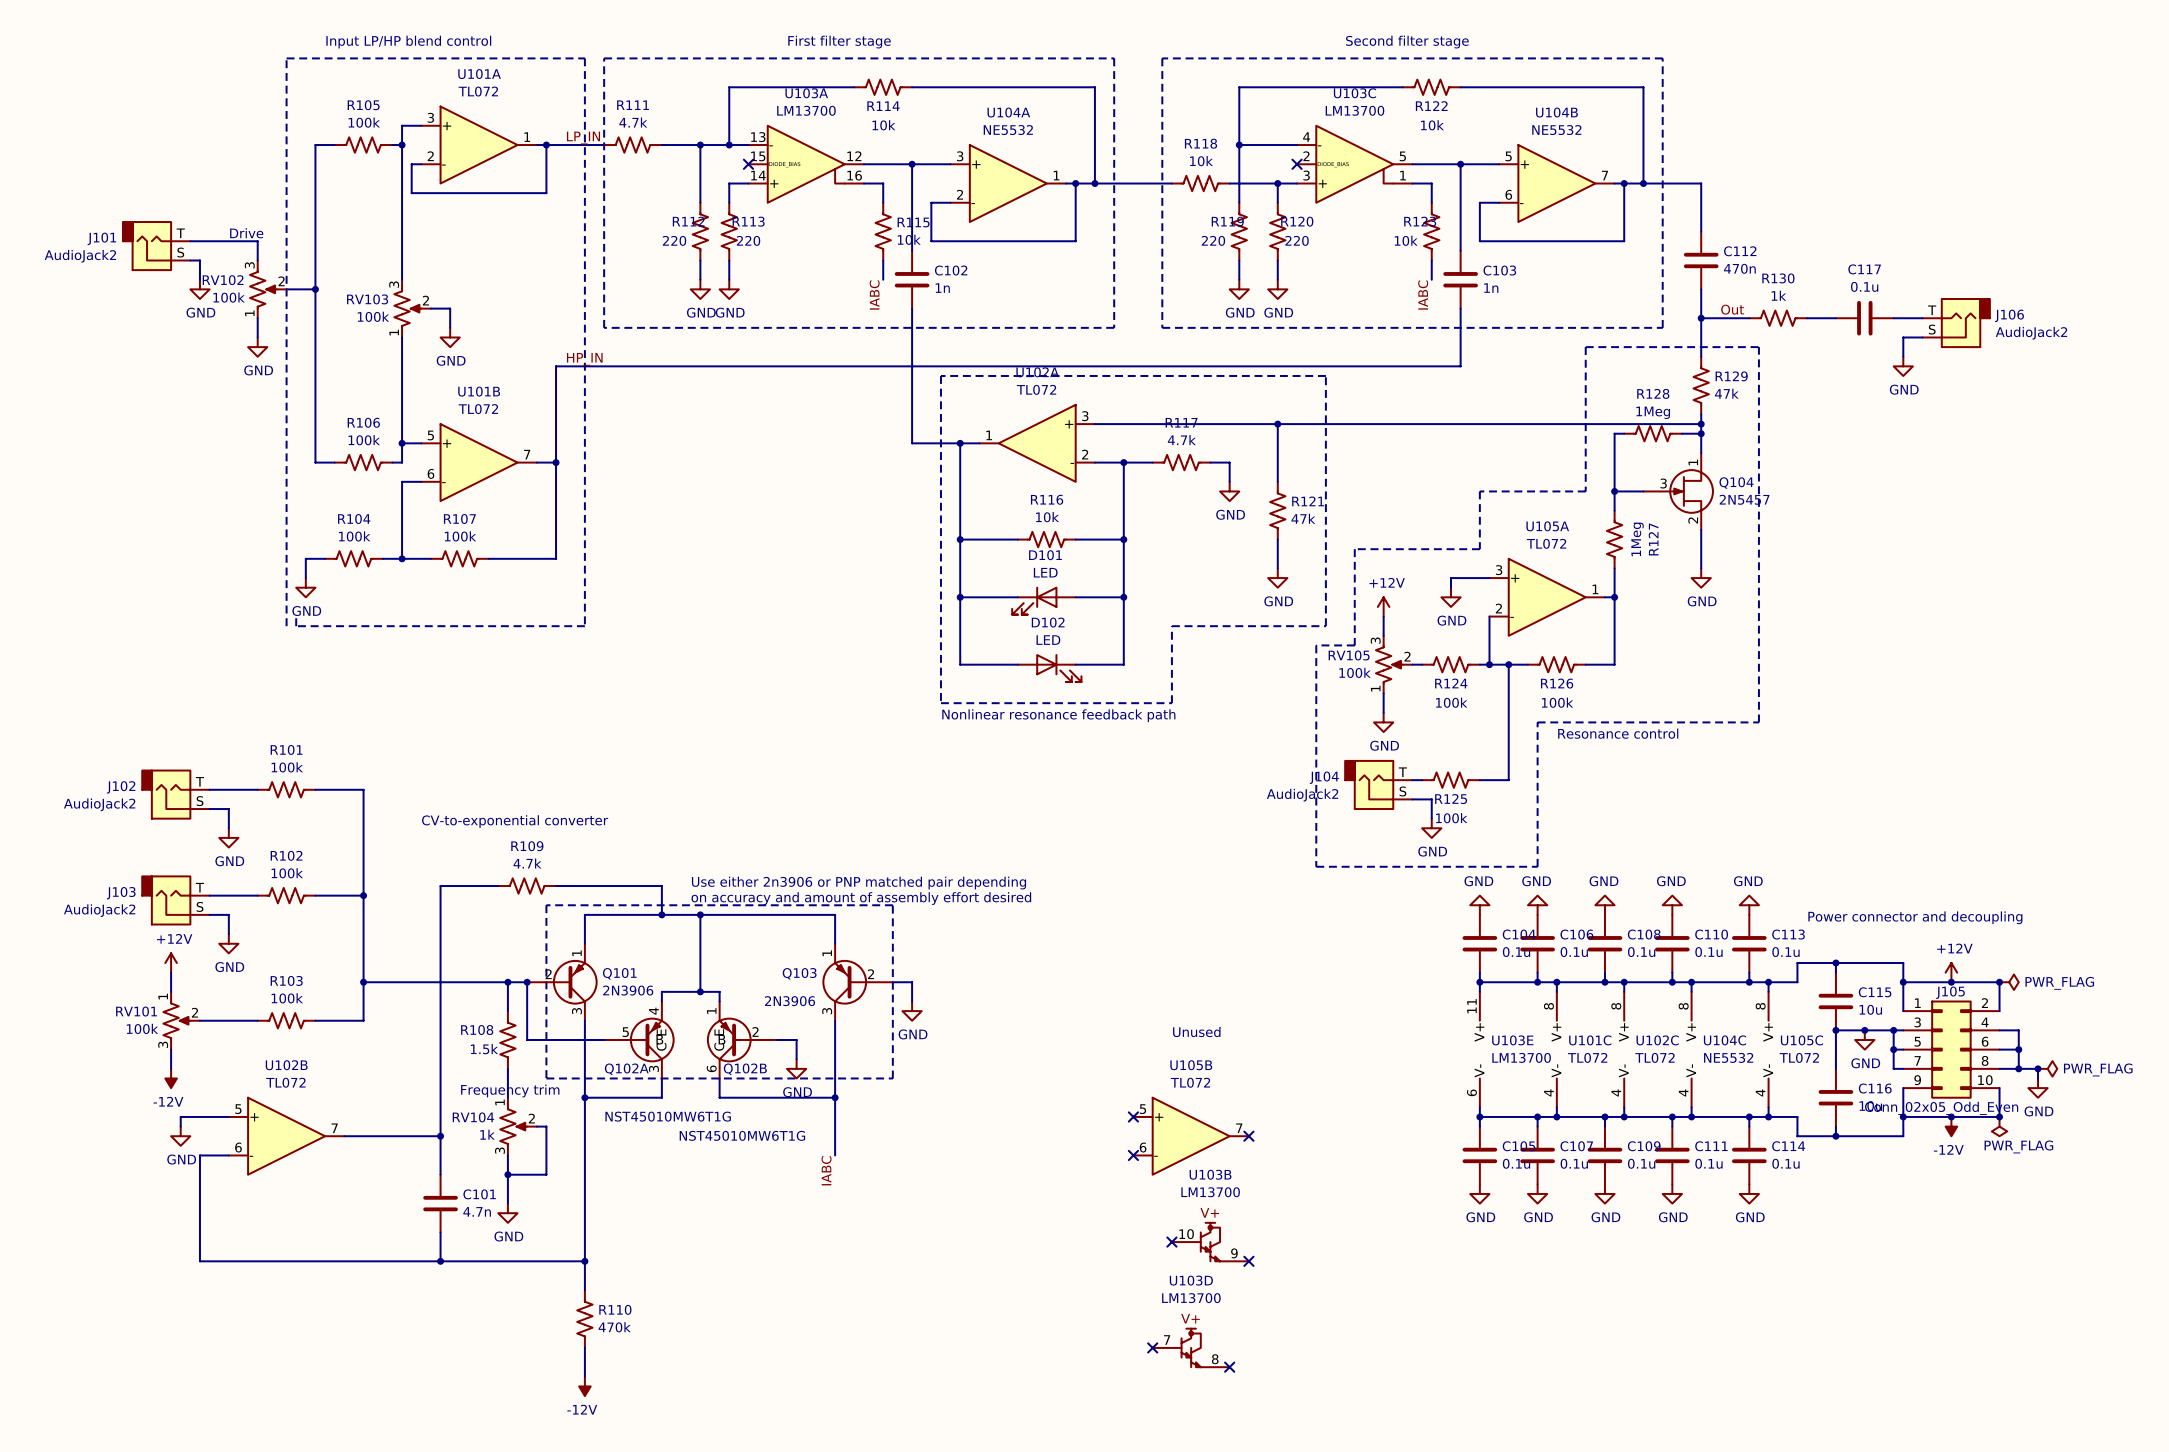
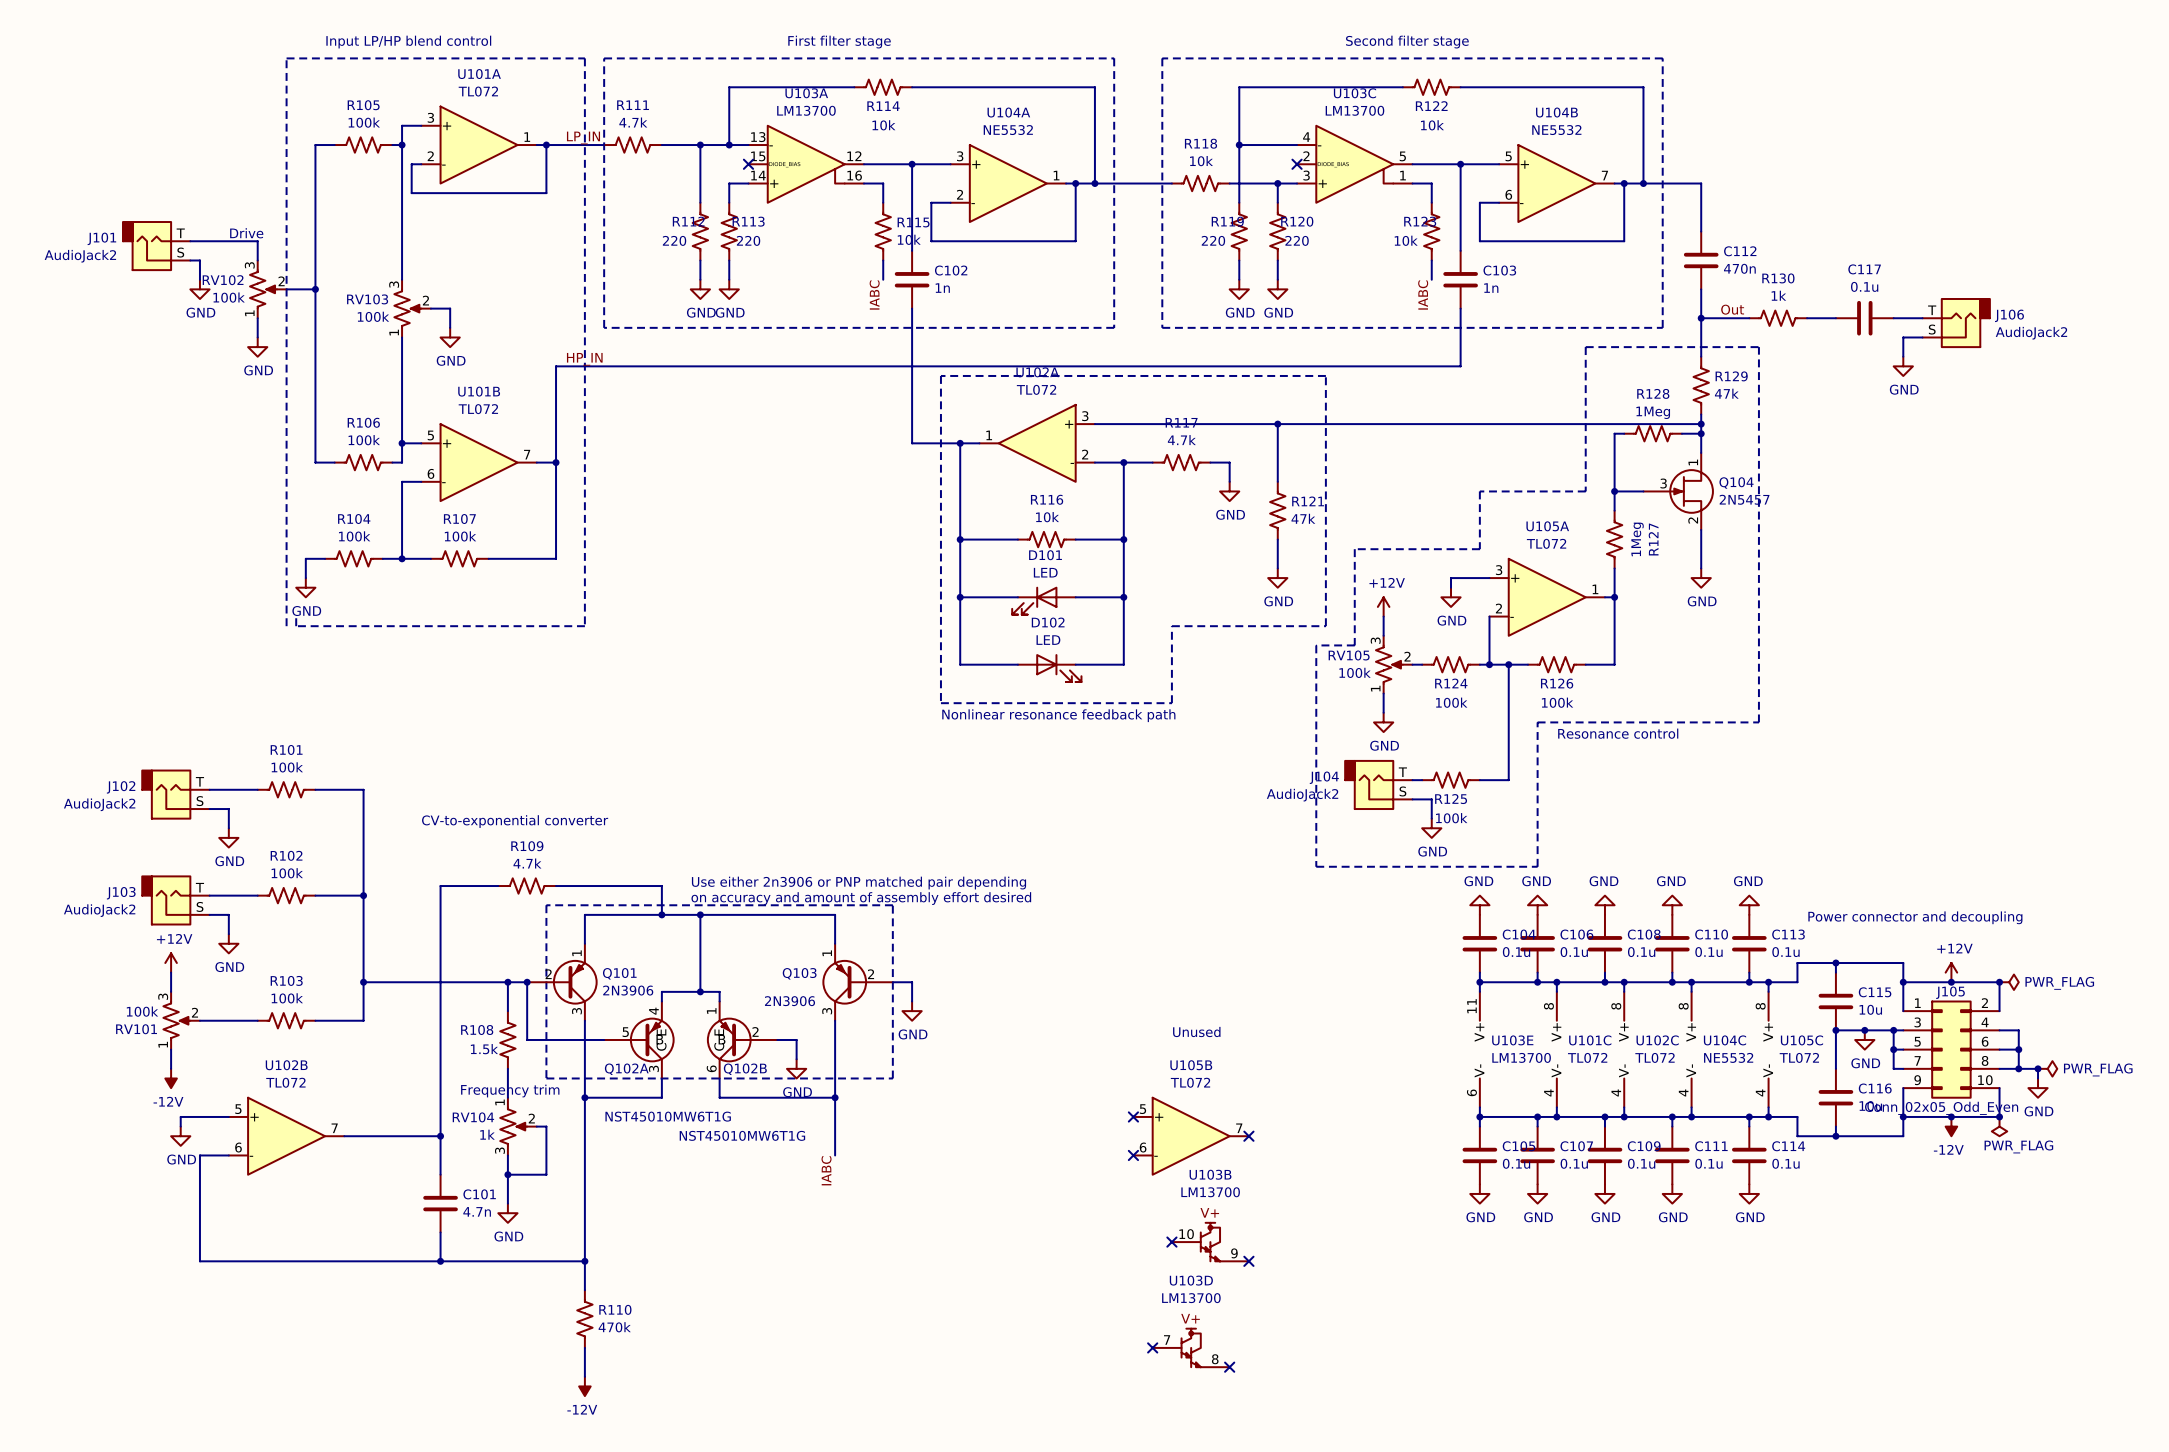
RV101 flip: as is (176, 1020) -> up-down (176, 1020)

